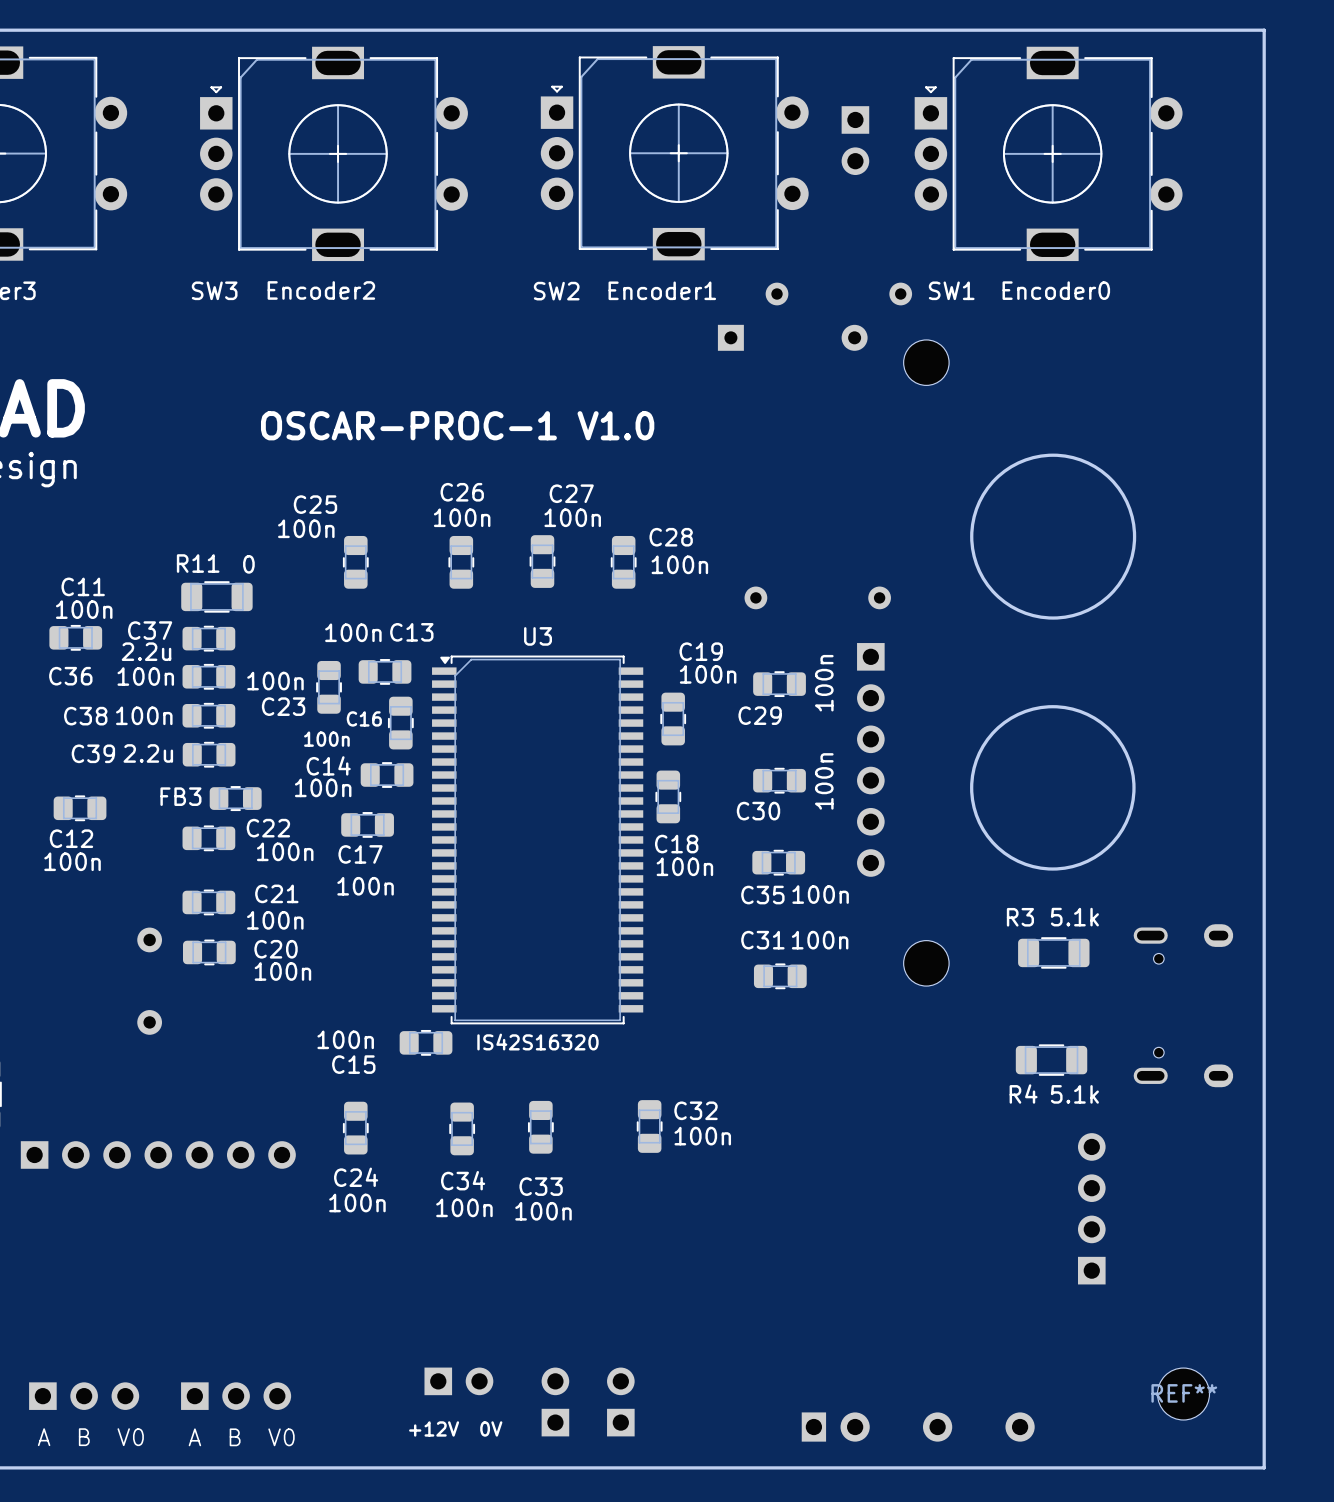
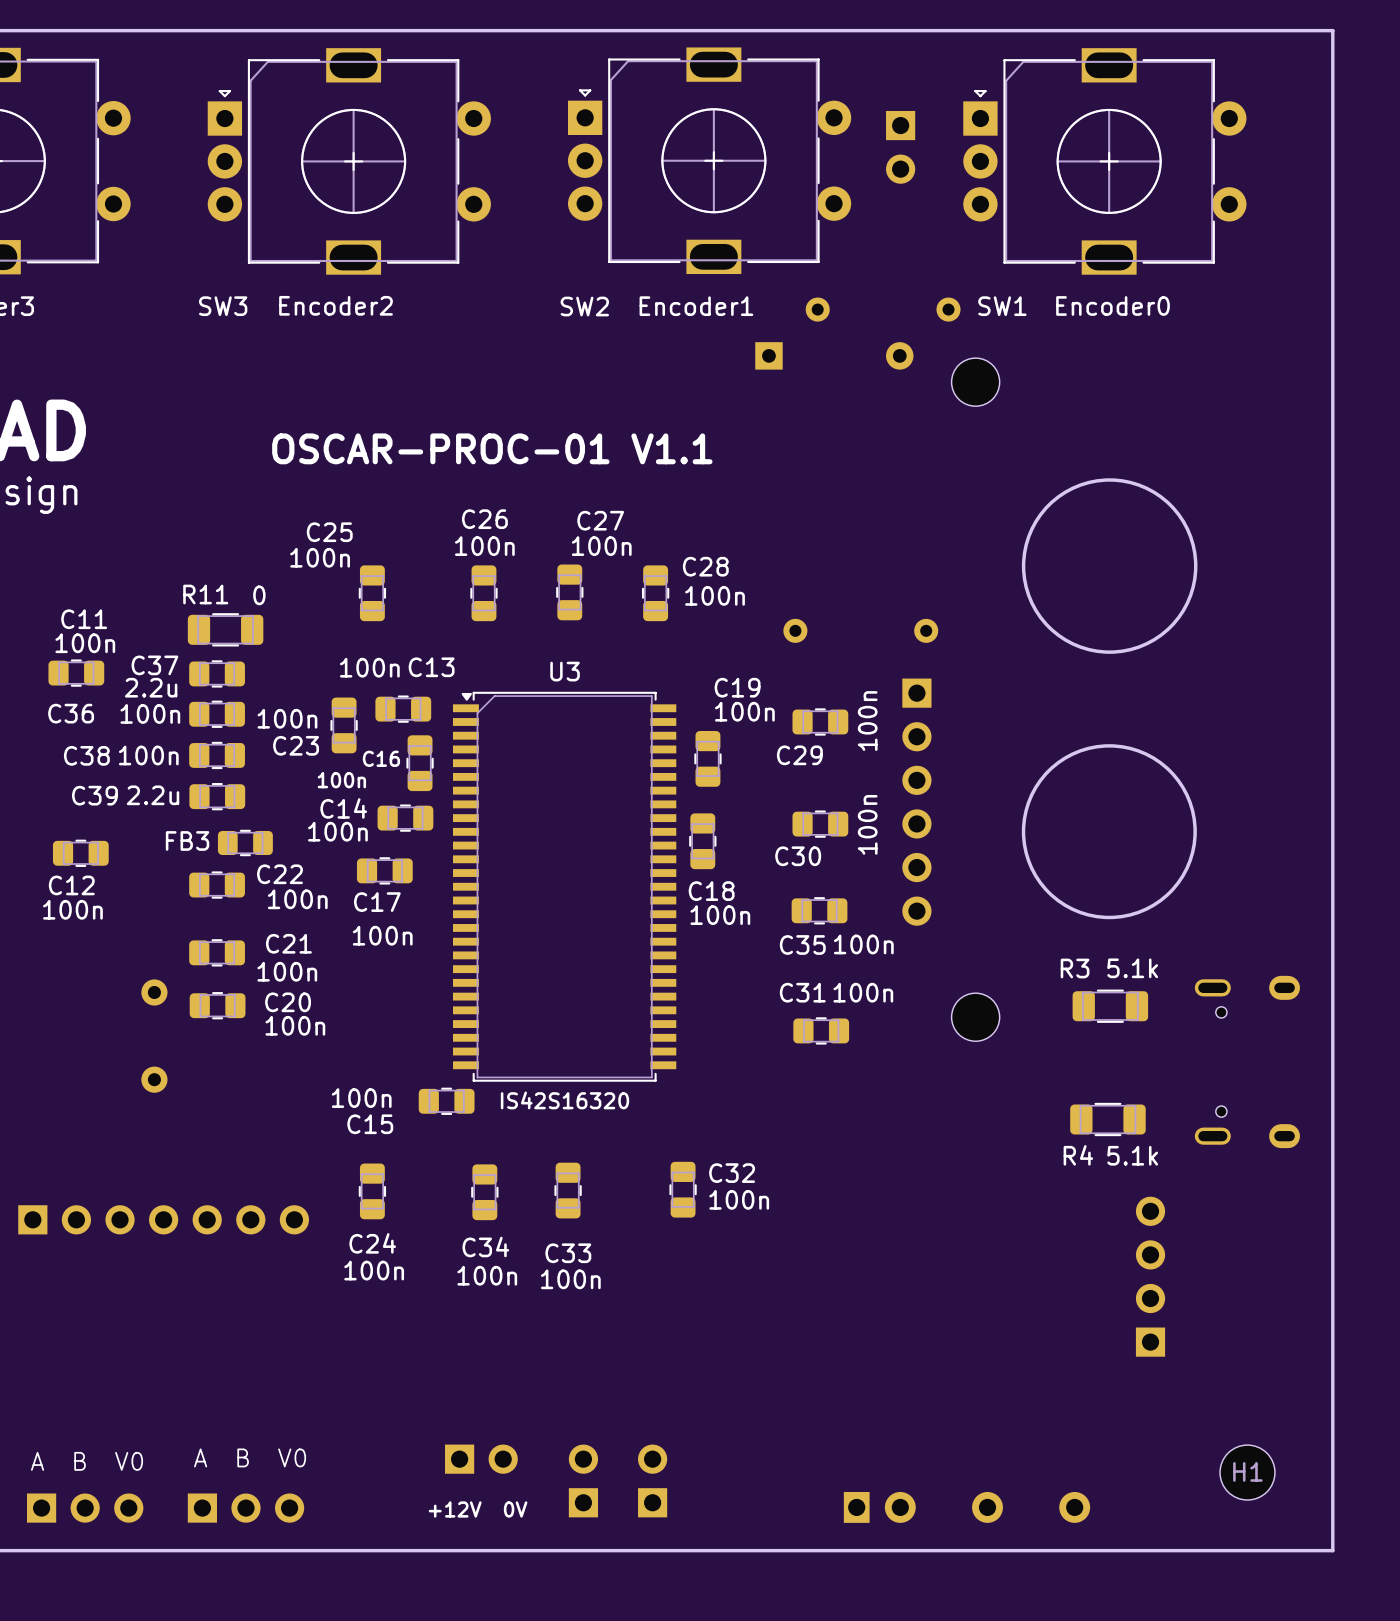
text: OSCAR-PROC-1 V1.0 (457, 425) -> OSCAR-PROC-01 V1.1 (492, 448)
REF** name: REF** (1184, 1393) -> H1 (1247, 1471)
part position: (84, 1396) -> (85, 1508)
part position: (236, 1396) -> (246, 1508)
text position: A B V0 (90, 1437) -> A B V0 (86, 1461)
text position: A B V0 (241, 1437) -> A B V0 (250, 1457)

